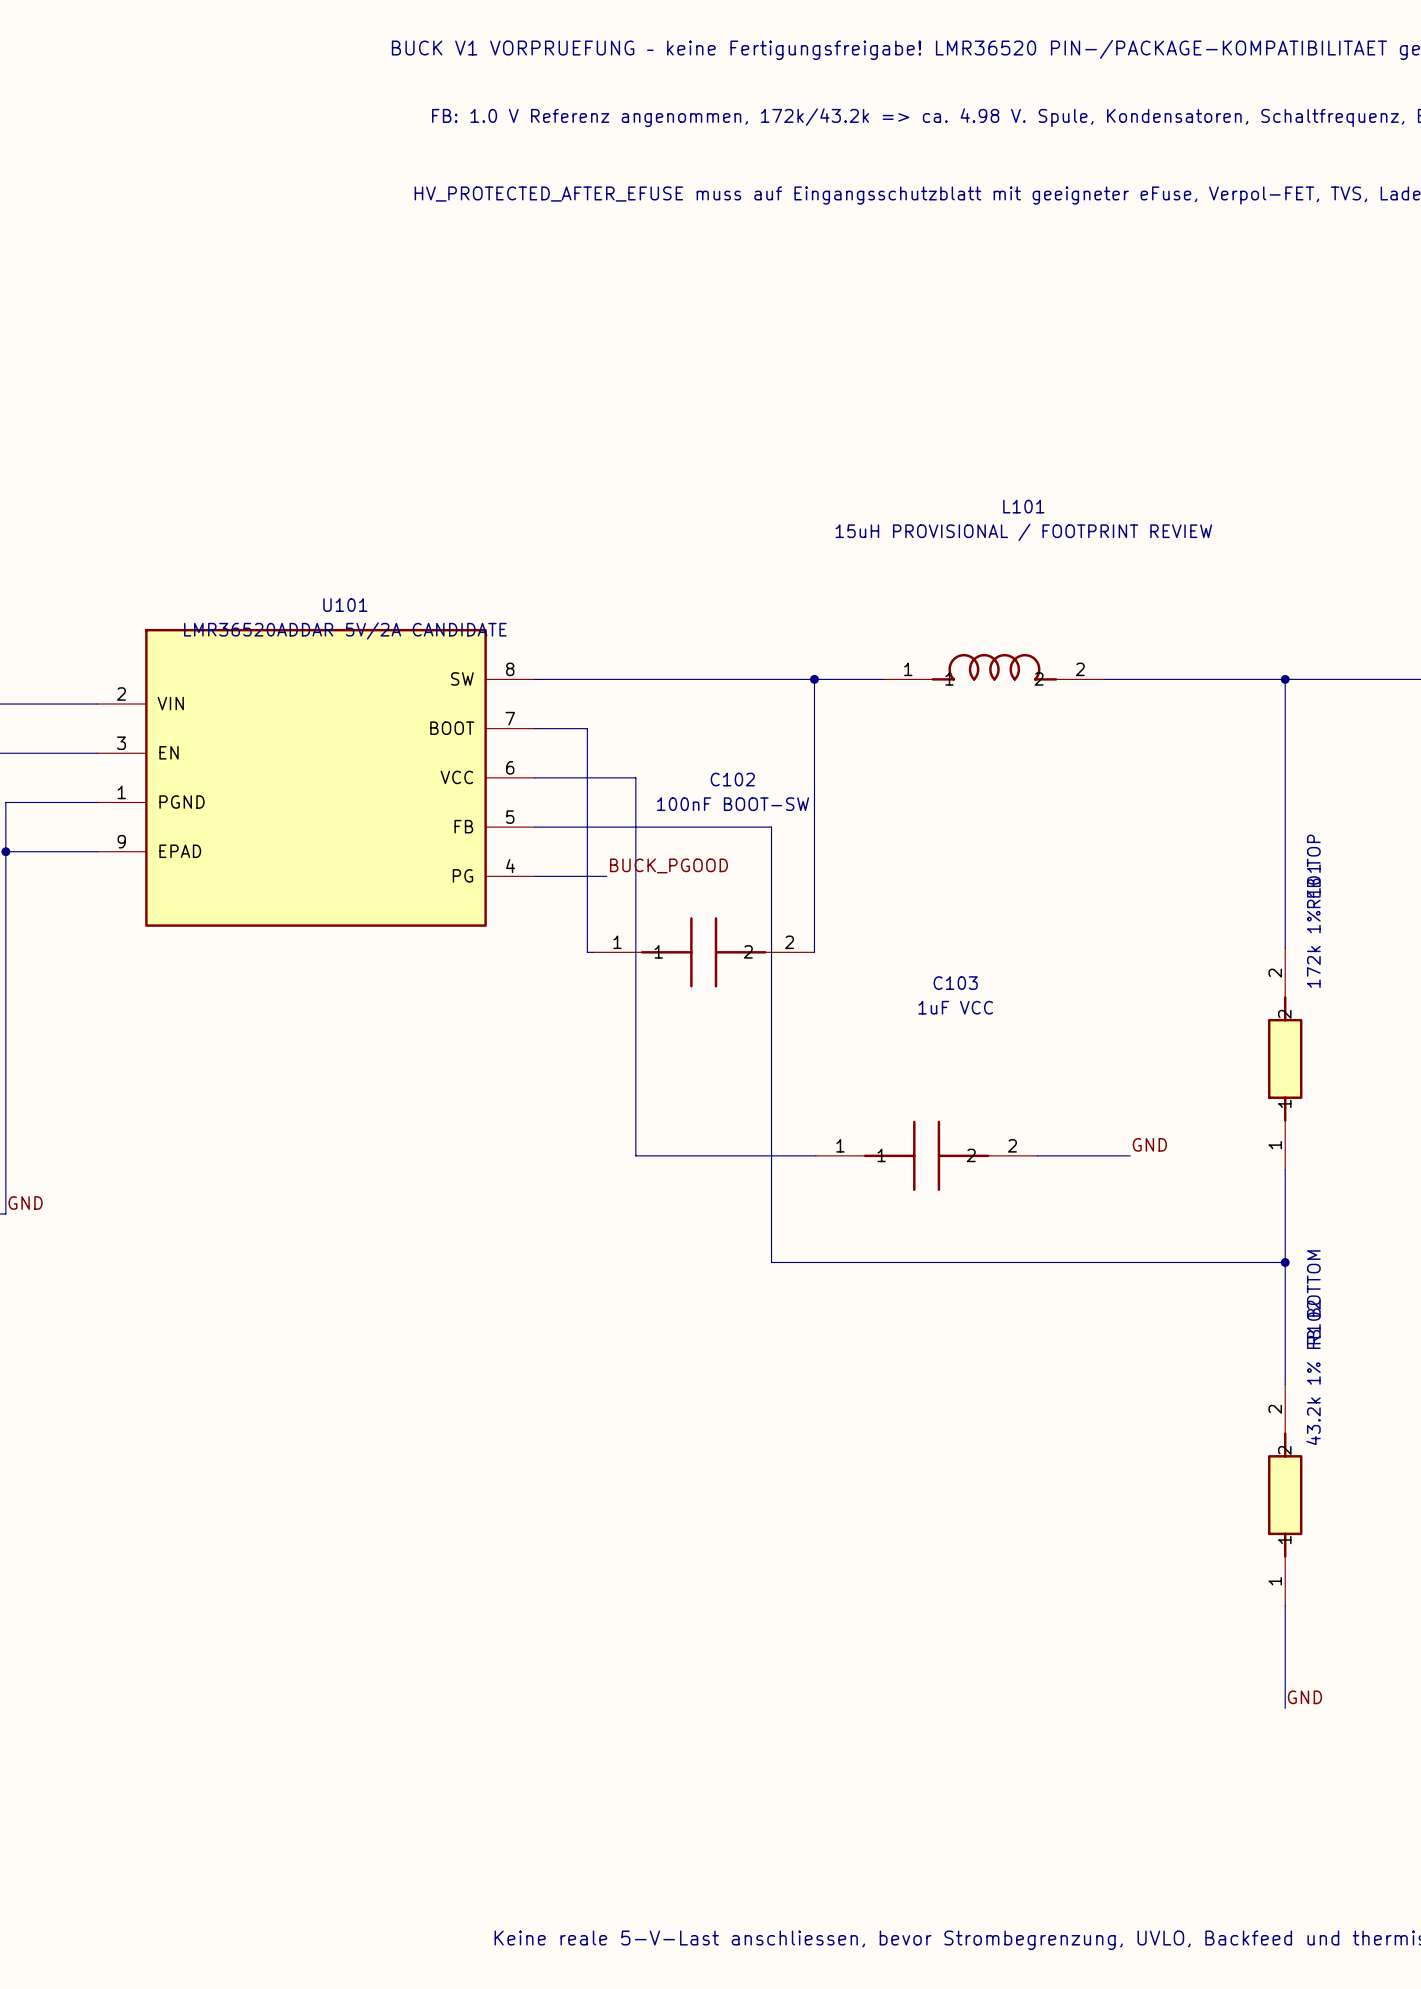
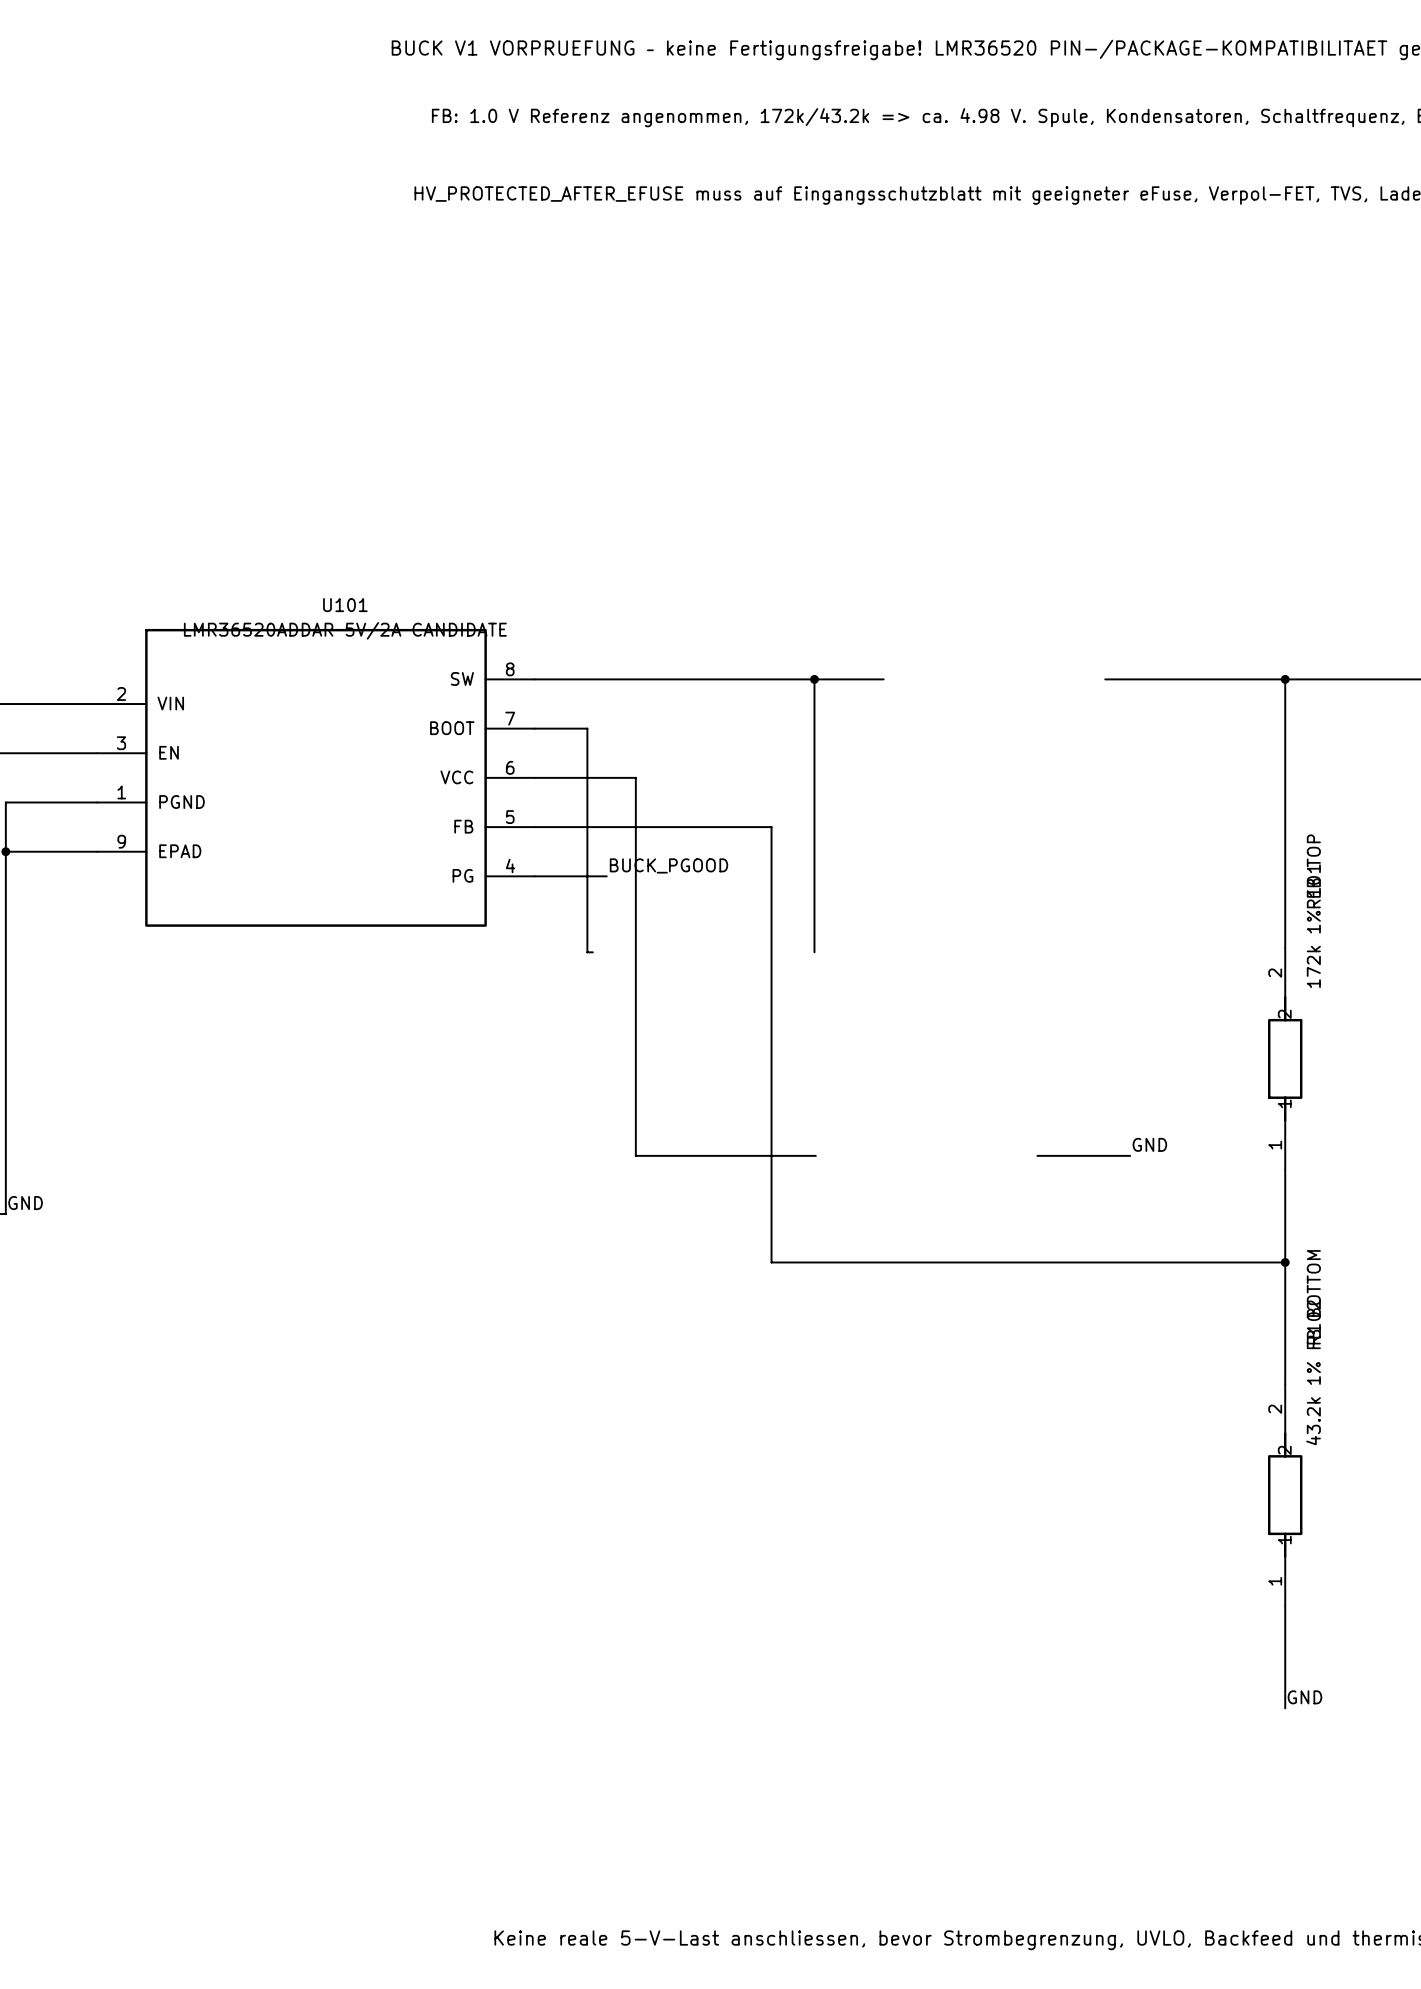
L101: 15uH PROVISIONAL / FOOTPRINT REVIEW (994, 667) -> none
C102: 100nF BOOT-SW (703, 952) -> none
C103: 1uF VCC (926, 1155) -> none

